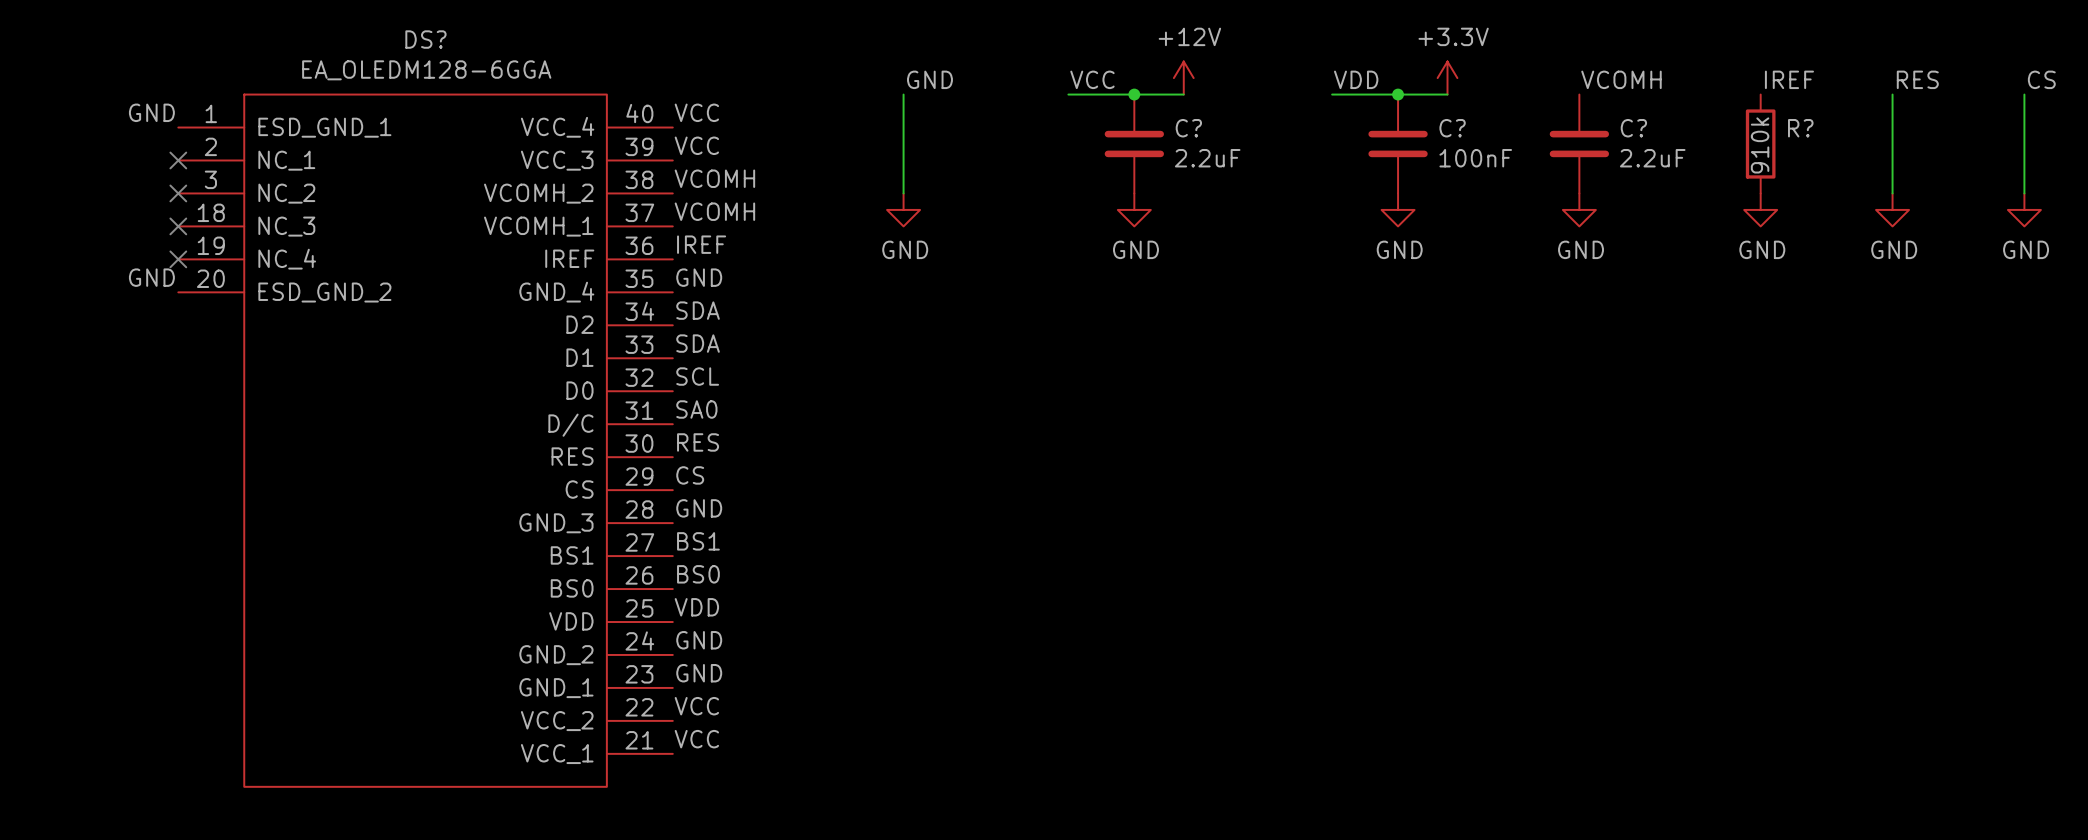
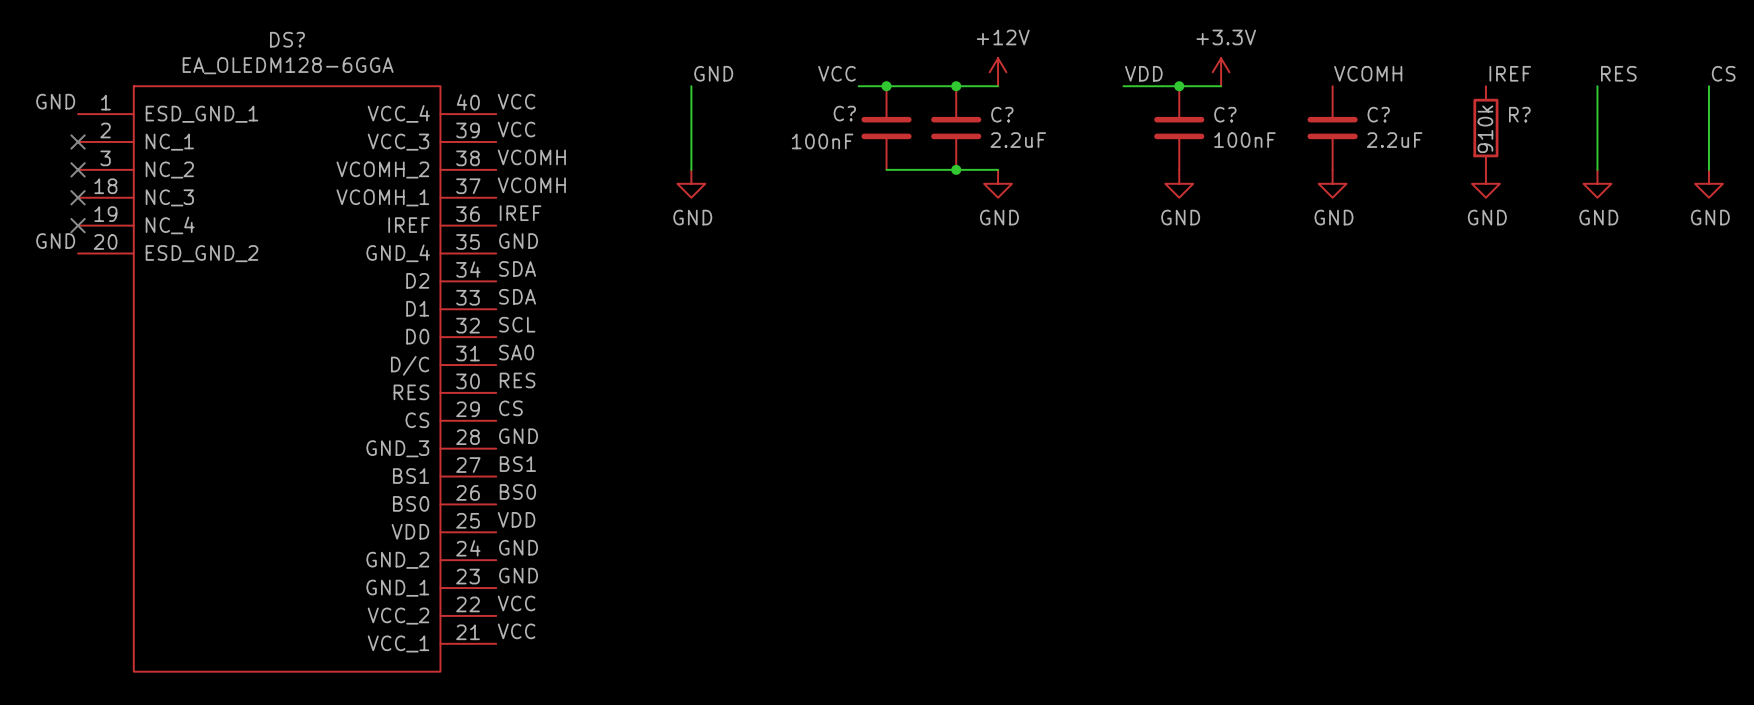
label position: GND (929, 79) -> GND (713, 73)
label position: VCC (1092, 79) -> VCC (836, 73)
wire: (903, 94) (903, 193) -> (691, 86) (691, 169)
wire: none -> (858, 86) (900, 86)
junction: none -> (886, 86)
label position: GND (151, 112) -> GND (55, 101)
label: none -> VCC (516, 101)
label: VCC (696, 112) -> none
C?: none -> 100nF (886, 128)
label: none -> VCC (516, 129)
label: VCC (696, 145) -> none
no-connect mark: none -> (78, 141)
no-connect mark: (178, 160) -> none
label: none -> VCOMH (531, 157)
label: VCOMH (714, 178) -> none
no-connect mark: none -> (78, 169)
no-connect mark: (178, 193) -> none
wire: none -> (886, 169) (998, 169)
junction: none -> (956, 169)
power symbol position: GND (903, 209) -> GND (691, 183)
power symbol position: GND (1134, 209) -> GND (998, 183)
label: none -> VCOMH (531, 185)
label: VCOMH (714, 211) -> none
no-connect mark: none -> (78, 197)
no-connect mark: (178, 226) -> none
label position: IREF (701, 244) -> IREF (520, 213)
no-connect mark: none -> (78, 225)
no-connect mark: (178, 259) -> none
label position: GND (151, 277) -> GND (55, 241)
label position: GND (699, 277) -> GND (518, 241)
label: none -> SDA (517, 268)
label: SDA (698, 310) -> none
label: none -> SDA (517, 296)
label: SDA (698, 343) -> none
label position: SCL (697, 376) -> SCL (517, 324)
label position: SA0 (696, 409) -> SA0 (516, 352)
DS? position: (425, 440) -> (287, 378)
label position: RES (698, 442) -> RES (517, 380)
label position: CS (690, 475) -> CS (510, 408)
label: none -> GND (518, 436)
label: GND (699, 508) -> none
label position: BS1 (698, 541) -> BS1 (517, 464)
label position: BS0 (698, 574) -> BS0 (517, 491)
label position: VDD (696, 607) -> VDD (516, 519)
label: none -> GND (518, 547)
label: GND (699, 640) -> none
label: none -> GND (518, 575)
label: GND (699, 673) -> none
label: none -> VCC (516, 603)
label: VCC (696, 706) -> none
label: none -> VCC (516, 631)
label: VCC (696, 739) -> none

